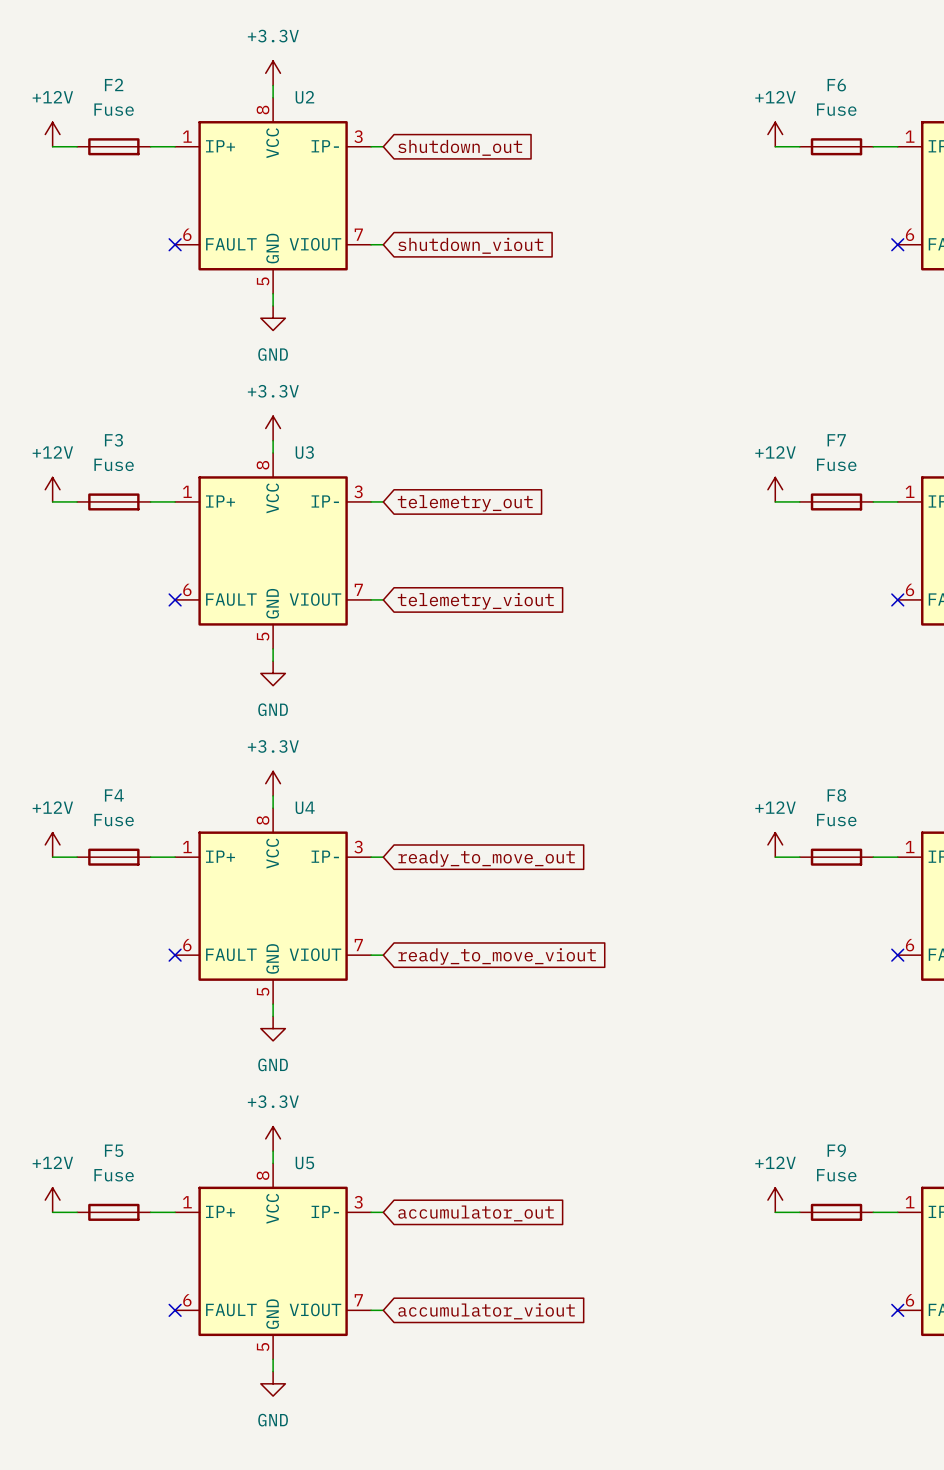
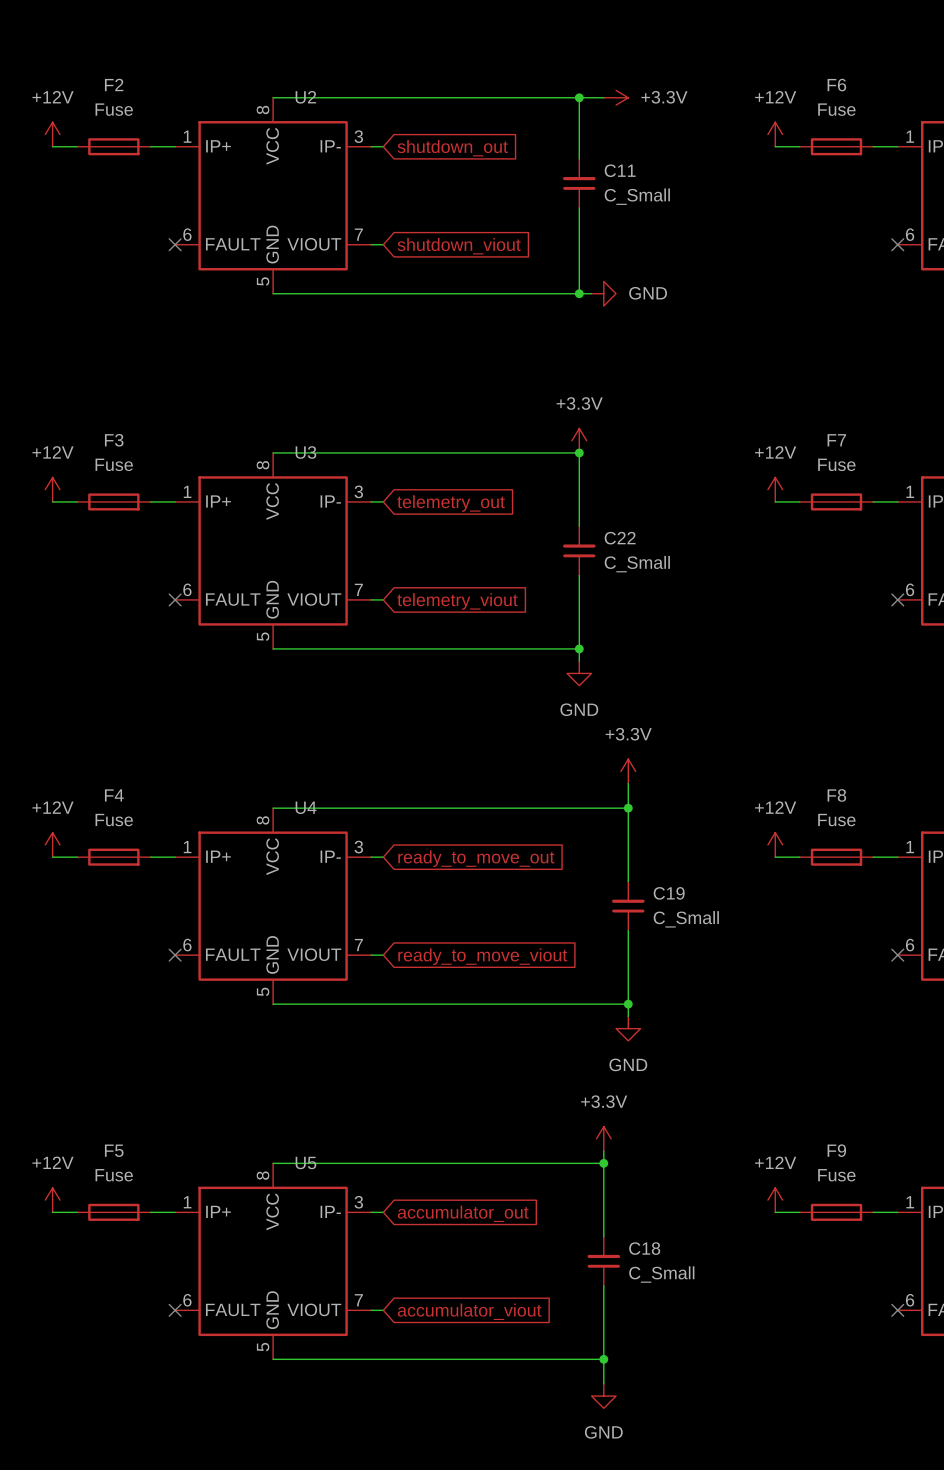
power symbol: +3.3V (273, 73) -> none
wire: (273, 85) (273, 97) -> (603, 97) (273, 97)
wire: none -> (579, 97) (579, 159)
junction: none -> (579, 97)
power symbol: none -> +3.3V (616, 97)
C11: none -> C_Small (579, 183)
wire: none -> (579, 208) (579, 293)
wire: (273, 293) (273, 305) -> (273, 293) (591, 293)
junction: none -> (579, 293)
power symbol: none -> GND (603, 293)
power symbol: GND (273, 318) -> none
power symbol: +3.3V (273, 428) -> none
wire: (273, 440) (273, 452) -> (579, 526) (579, 452) (273, 452)
power symbol: none -> +3.3V (579, 440)
junction: none -> (579, 452)
C22: none -> C_Small (579, 550)
wire: none -> (579, 575) (579, 661)
wire: (273, 648) (273, 661) -> (273, 648) (579, 648)
junction: none -> (579, 648)
power symbol: GND (273, 673) -> none
power symbol: none -> GND (579, 673)
power symbol: none -> +3.3V (628, 771)
power symbol: +3.3V (273, 783) -> none
wire: none -> (628, 783) (628, 881)
wire: (273, 795) (273, 808) -> (628, 808) (273, 808)
junction: none -> (628, 808)
C19: none -> C_Small (628, 906)
wire: none -> (628, 930) (628, 1016)
wire: (273, 1004) (273, 1016) -> (273, 1004) (628, 1004)
junction: none -> (628, 1004)
power symbol: GND (273, 1028) -> none
power symbol: none -> GND (628, 1028)
power symbol: +3.3V (273, 1138) -> none
power symbol: none -> +3.3V (603, 1138)
wire: (273, 1151) (273, 1163) -> (603, 1163) (273, 1163)
wire: none -> (603, 1151) (603, 1236)
junction: none -> (603, 1163)
C18: none -> C_Small (603, 1261)
wire: none -> (603, 1285) (603, 1383)
wire: (273, 1359) (273, 1371) -> (273, 1359) (603, 1359)
junction: none -> (603, 1359)
power symbol: GND (273, 1383) -> none
power symbol: none -> GND (603, 1396)

